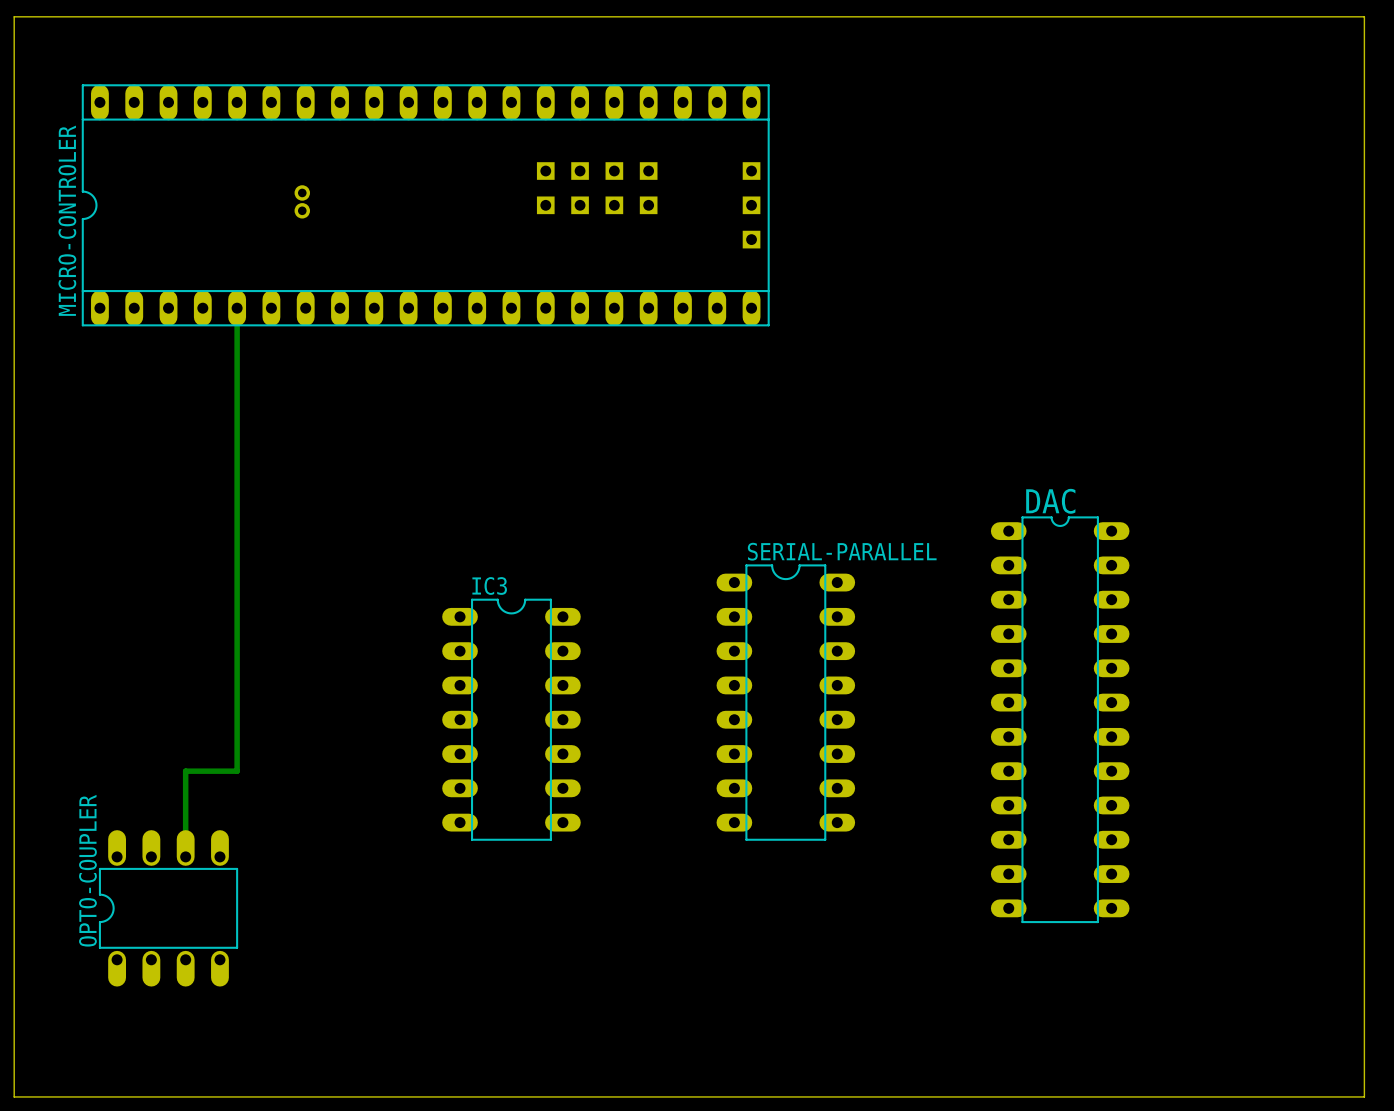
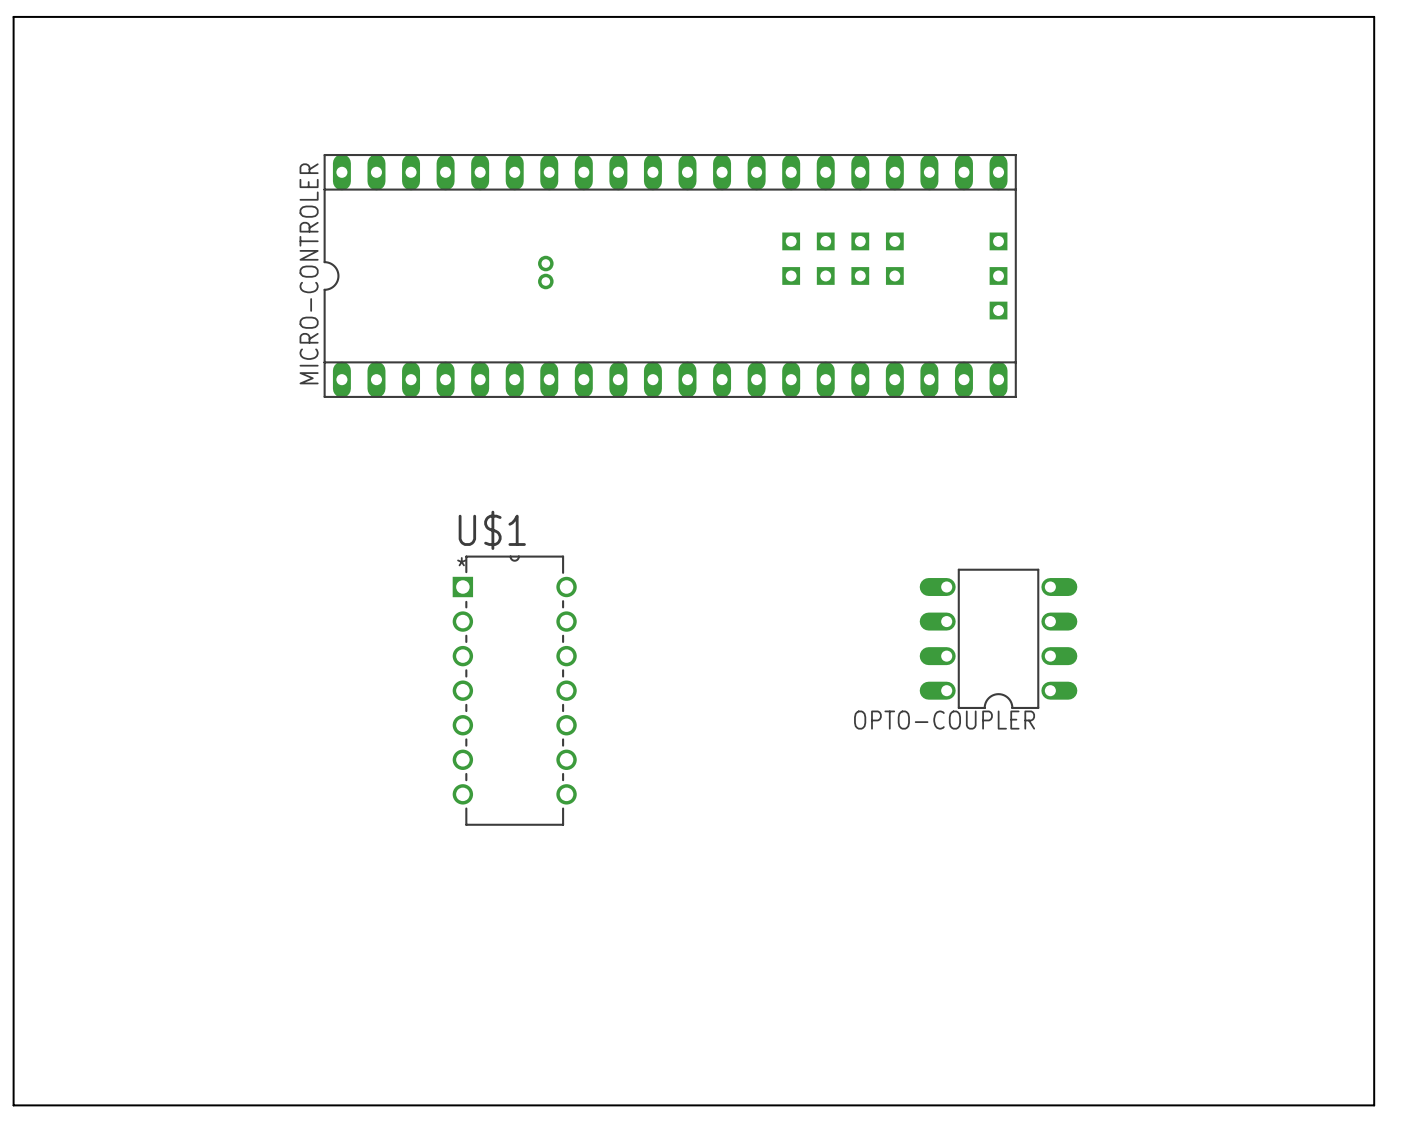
MICRO-CONTROLER position: (425, 205) -> (670, 275)
bottom track: (237, 308) (237, 771) (185, 771) (185, 856) -> none
OPTO-COUPLER: none -> (998, 638)
U$1: none -> (514, 690)
SERIAL-PARALLEL: (785, 702) -> none
IC3: (511, 719) -> none
DAC: (1060, 719) -> none
OPTO-COUPLER: (168, 908) -> none

